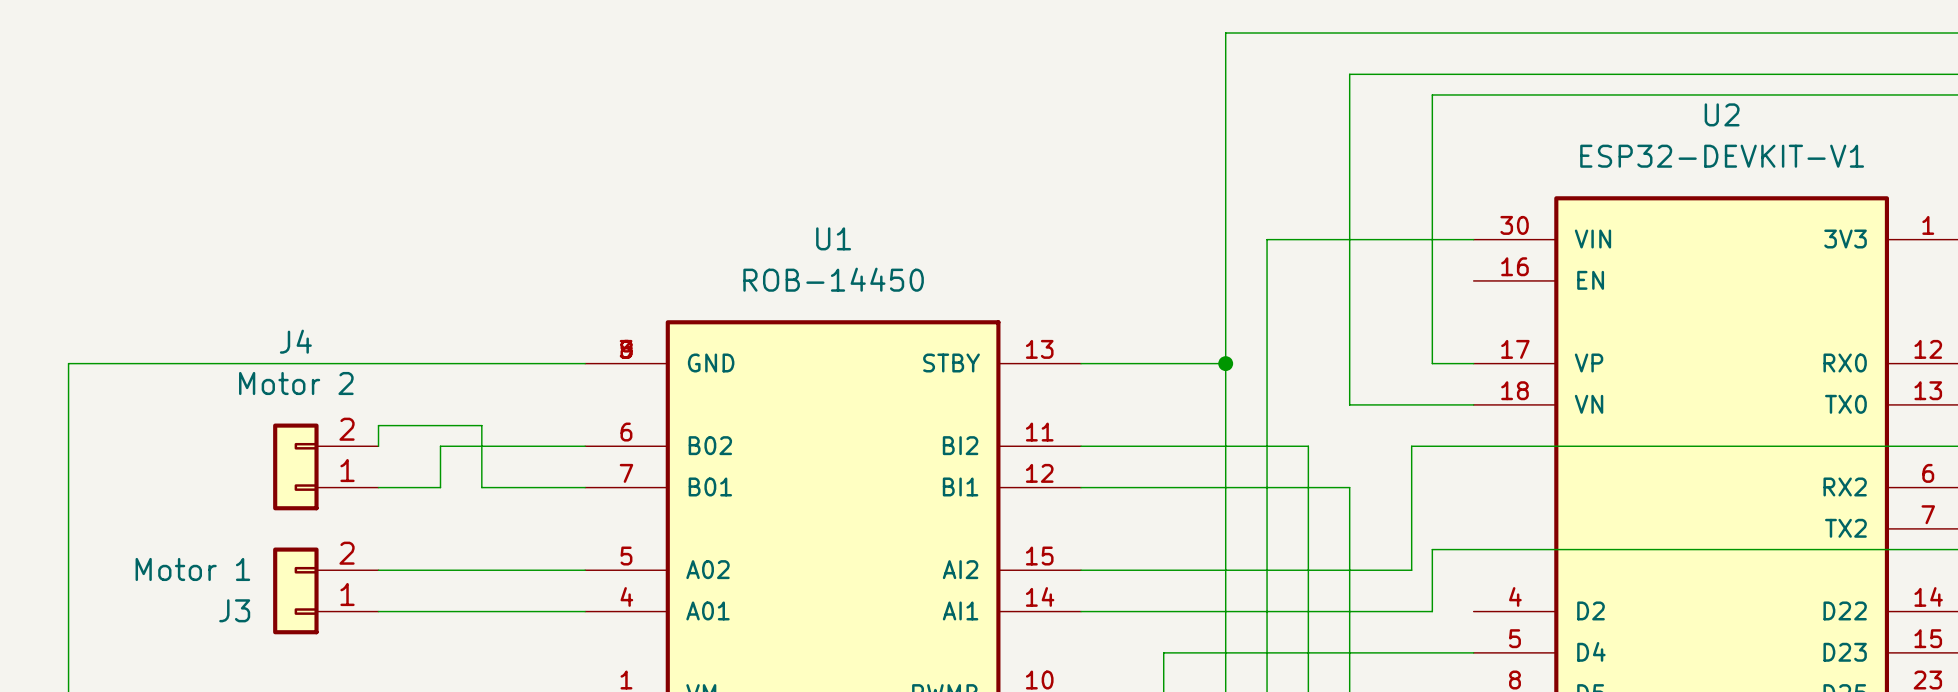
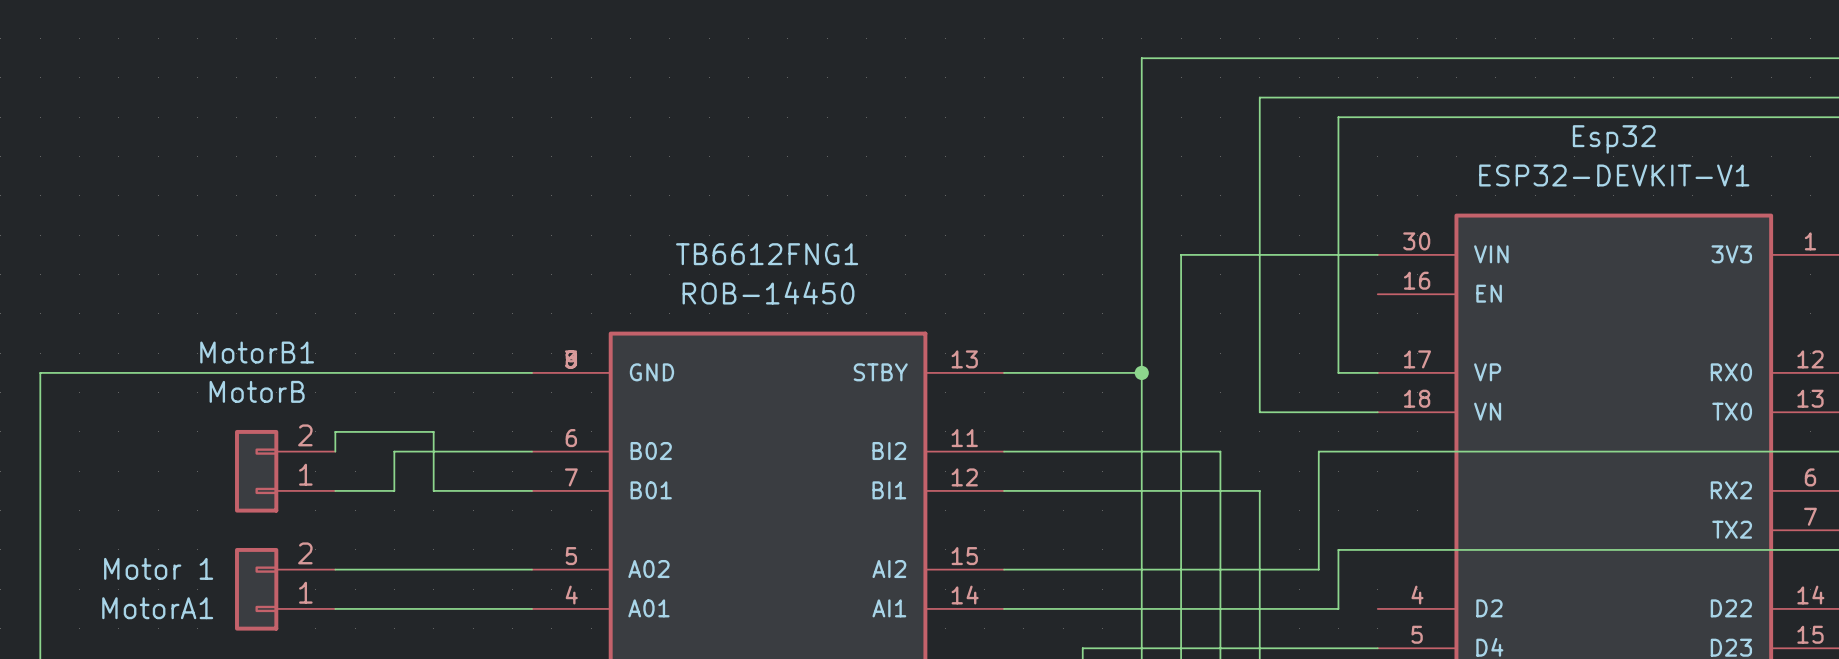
U2 name: U2 (1722, 114) -> Esp32 (1614, 139)
U1 name: U1 (833, 238) -> TB6612FNG1 (767, 254)
J4 name: J4 (295, 341) -> MotorB1 (257, 352)
J4 value: Motor 2 (296, 383) -> MotorB (257, 391)
J3 name: J3 (234, 610) -> MotorA1 (157, 608)

